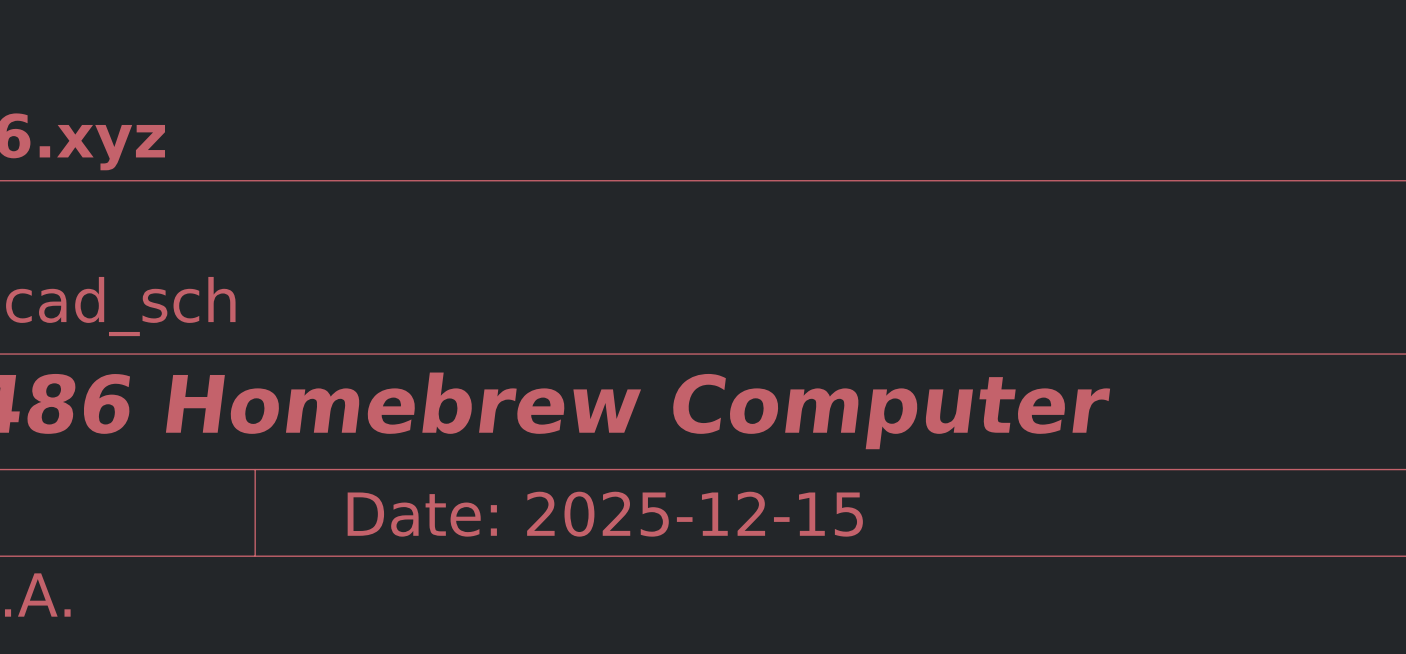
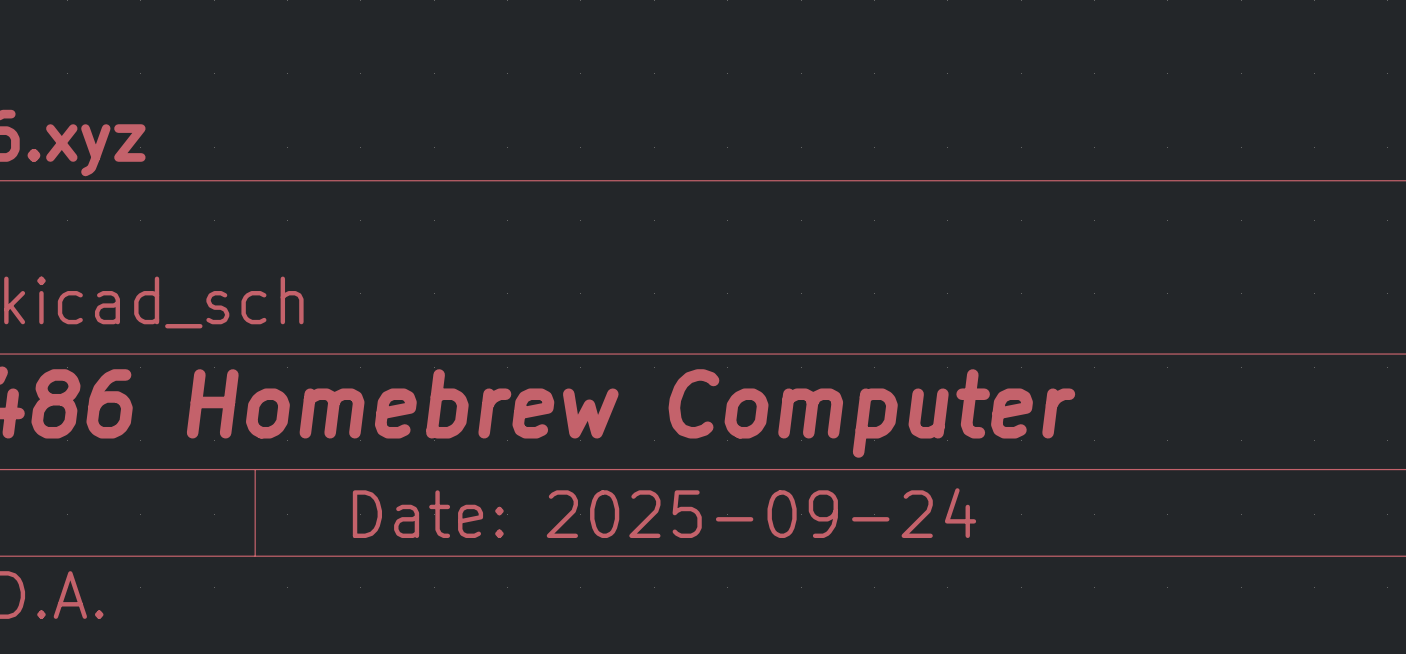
title block: Date: 2025-12-15 (605, 514) -> Date: 2025-09-24 (664, 513)

